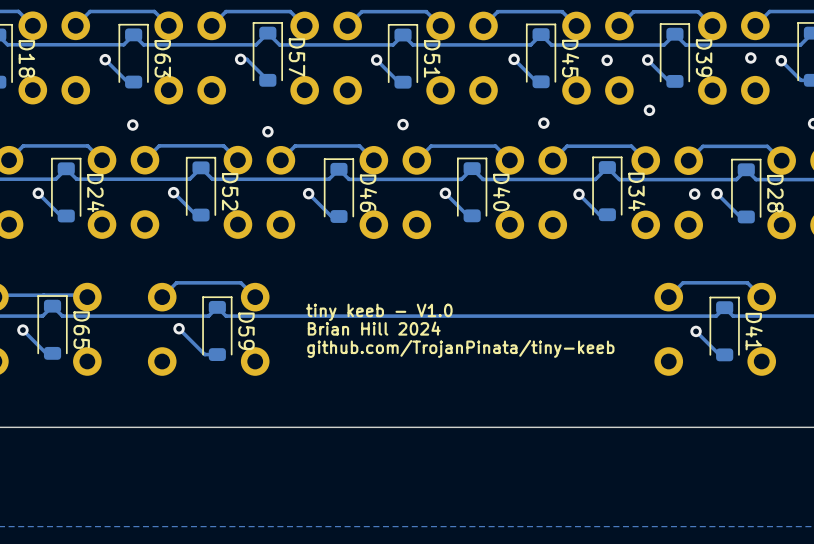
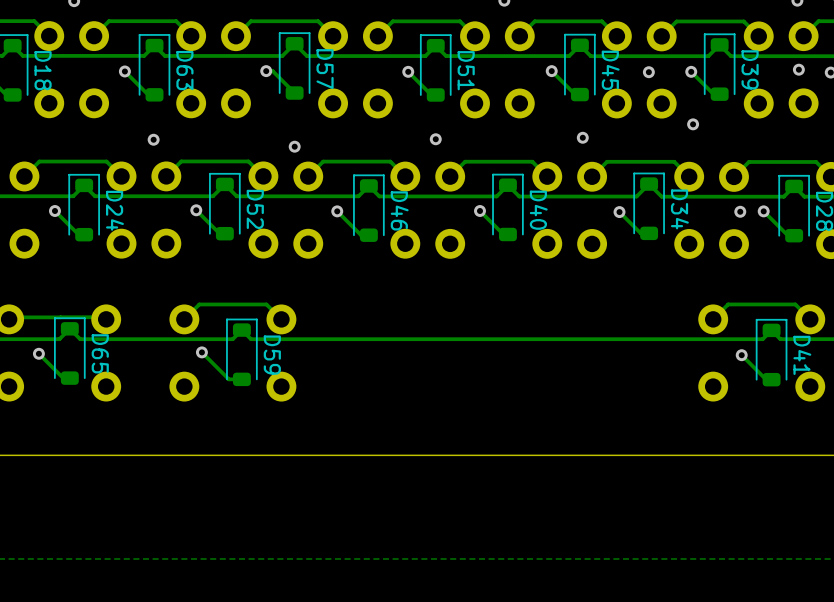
text: tiny keeb - V1.0 (379, 312) -> none
text: Brian Hill 2024 (374, 328) -> none
text: github.com/TrojanPinata/tiny-keeb (460, 348) -> none

